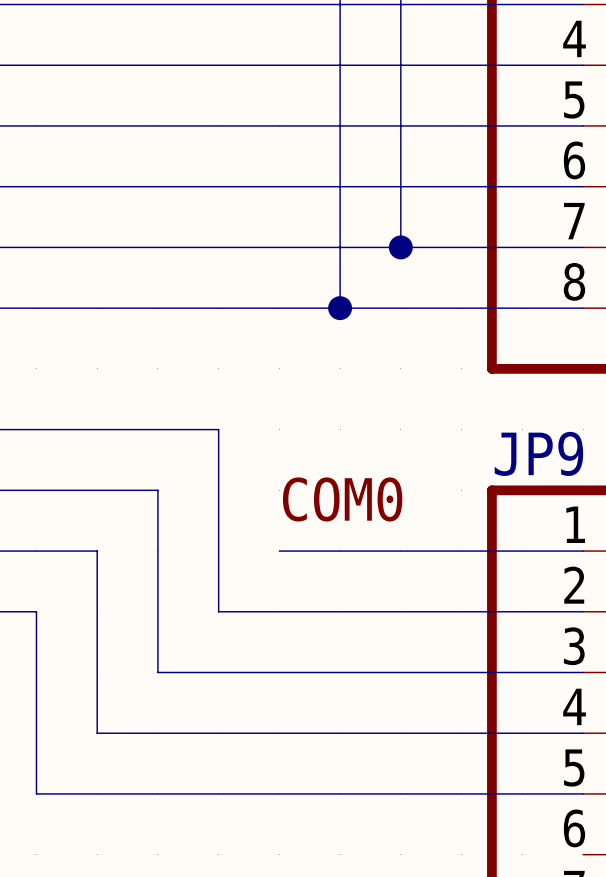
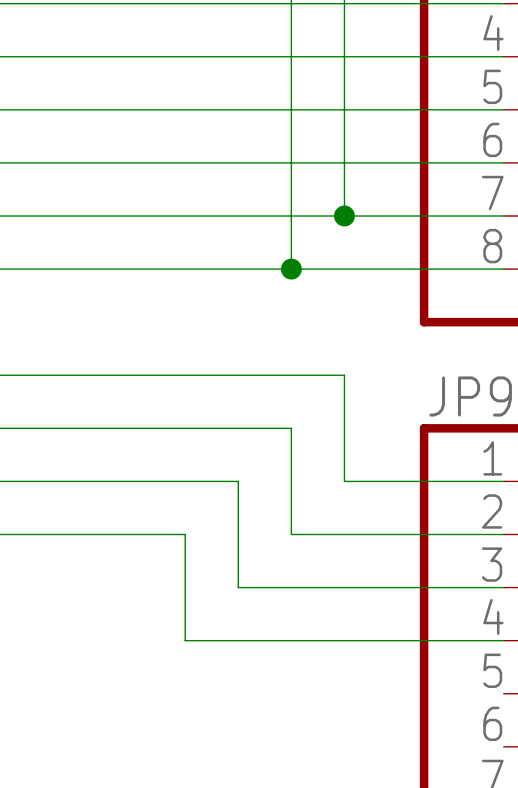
wire: (218, 429) (218, 611) (340, 611) -> (132, 428) (291, 428) (291, 534)
wire: (157, 490) (157, 672) (279, 672) -> none
label: COM0 (342, 499) -> none
wire: (97, 551) (97, 733) (218, 733) -> (79, 481) (238, 481) (238, 587)
wire: (279, 551) (400, 551) -> (185, 375) (344, 375) (344, 481)
wire: (36, 611) (36, 793) (583, 793) -> (25, 534) (185, 534) (185, 640)

